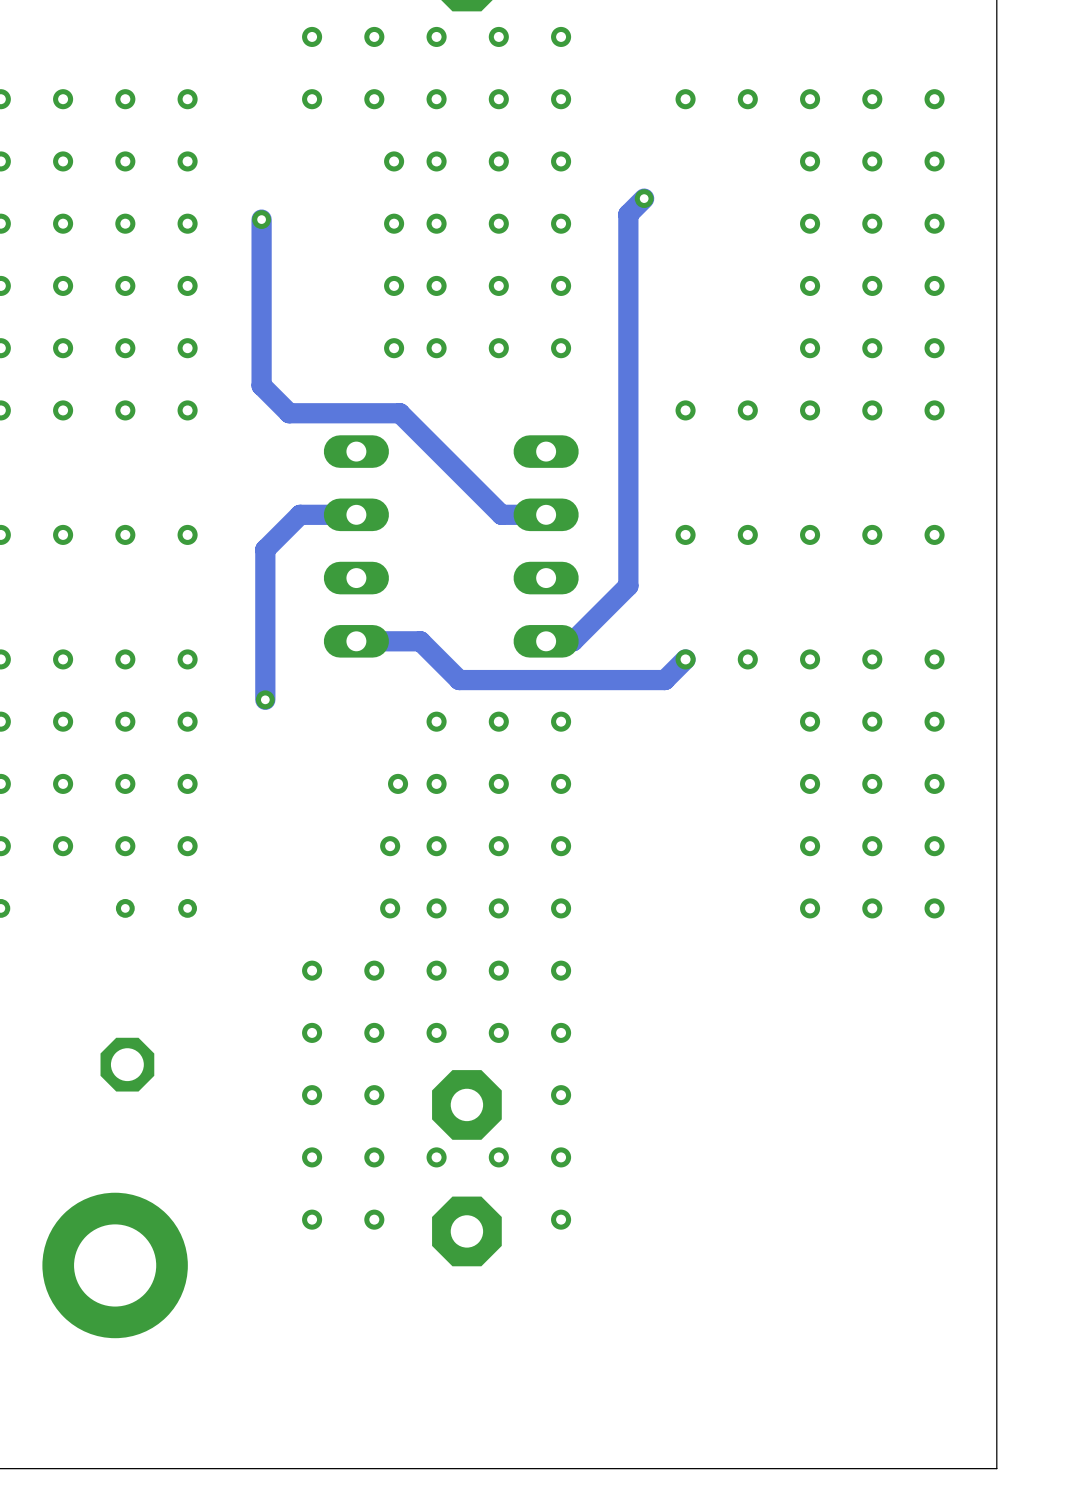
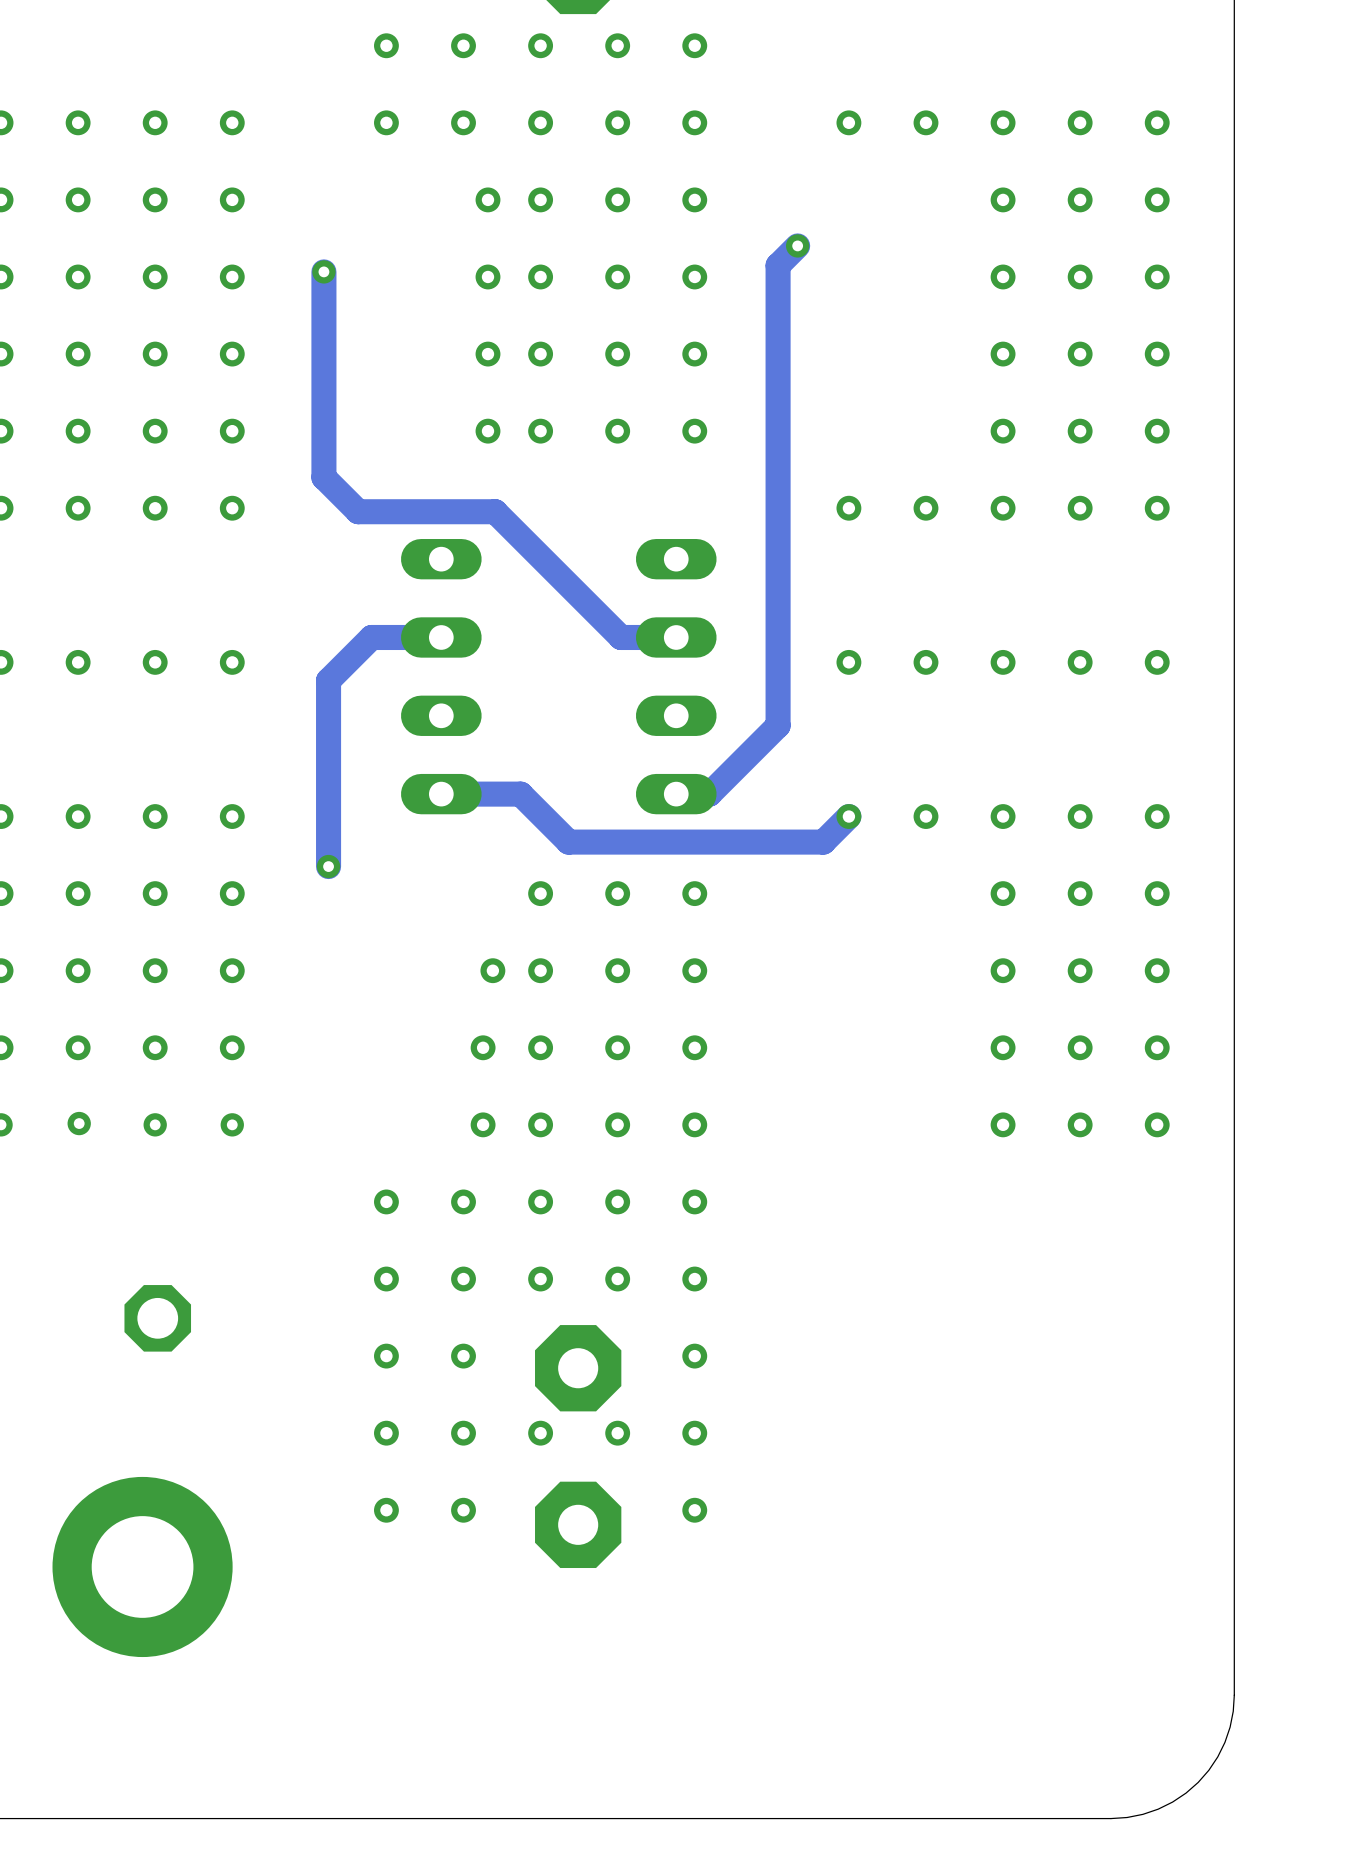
via: none -> (79, 1123)
board edge: (996, 1369) (996, 1468) (897, 1468) -> (1234, 1695) (1233, 1711) (1224, 1742) (1217, 1756) (1198, 1782) (1172, 1802) (1158, 1809) (1127, 1817) (1110, 1818)

